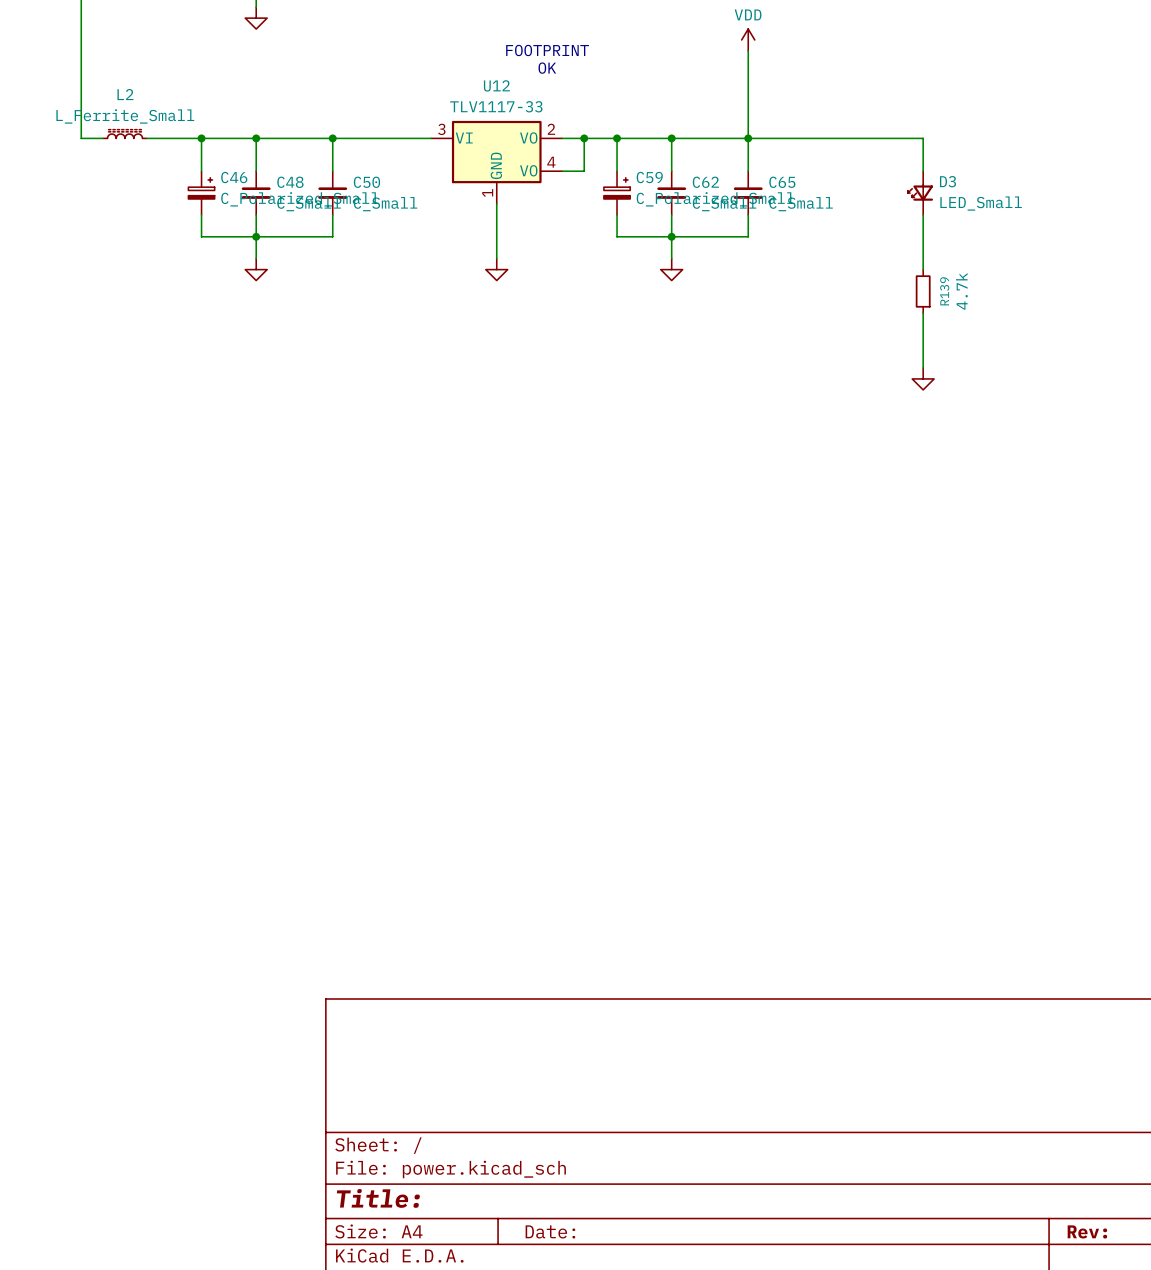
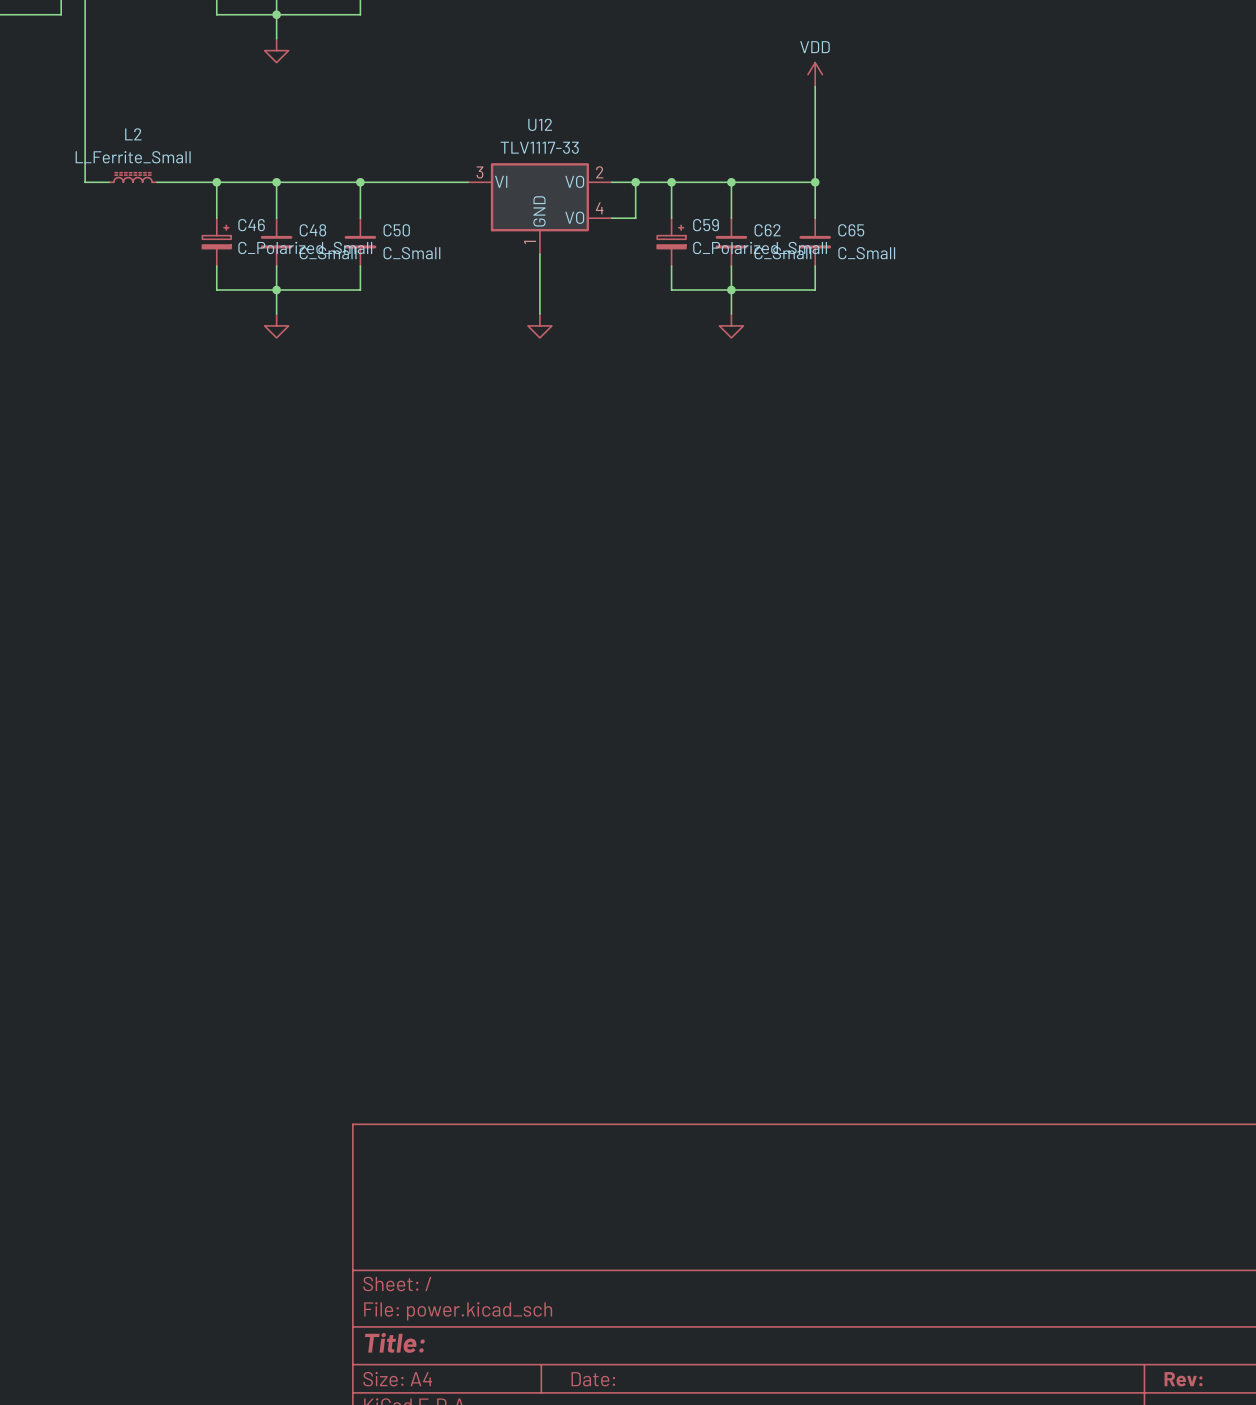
text: FOOTPRINT (547, 50) -> none
text: OK (547, 68) -> none
wire: (748, 138) (923, 138) (923, 171) -> none
D3: LED_Small (920, 193) -> none
wire: (923, 214) (923, 269) -> none
R139: 4.7k (923, 291) -> none
wire: (923, 313) (923, 368) -> none
power symbol: (923, 378) -> none

